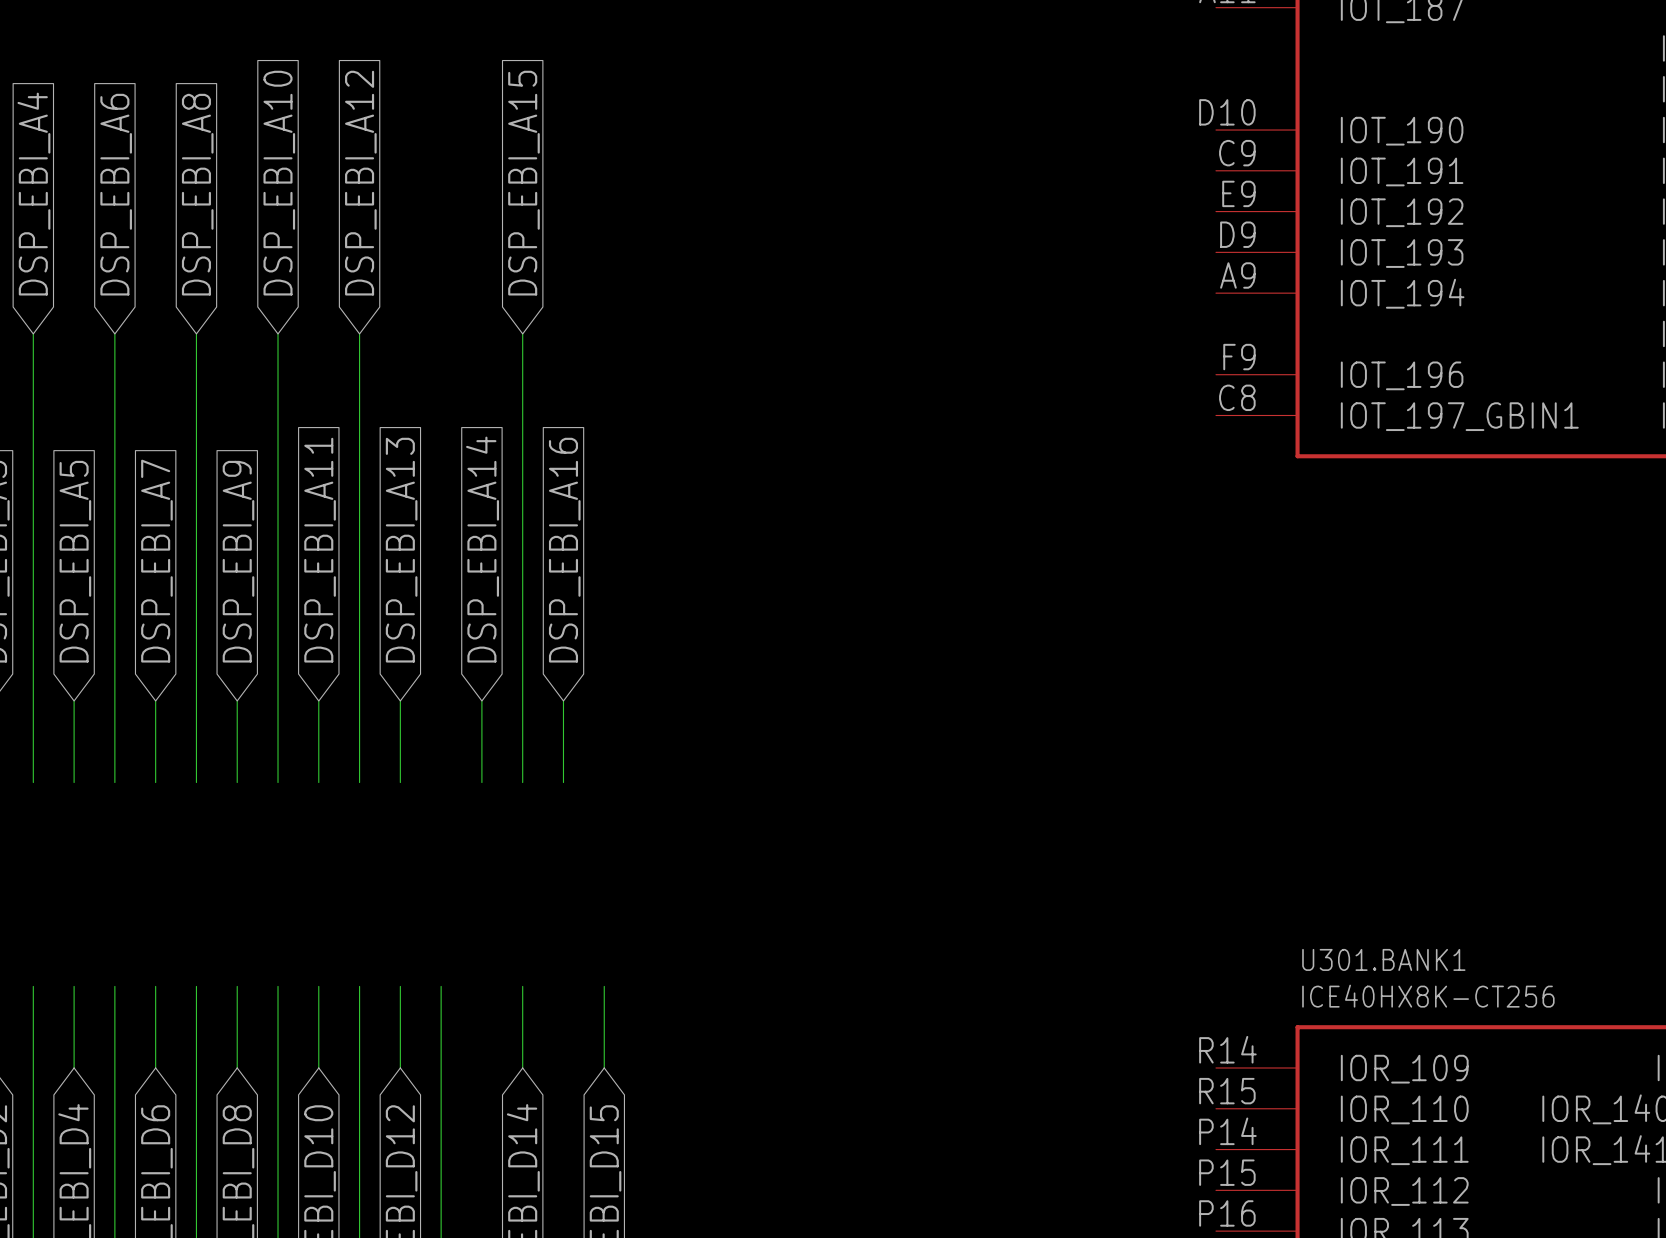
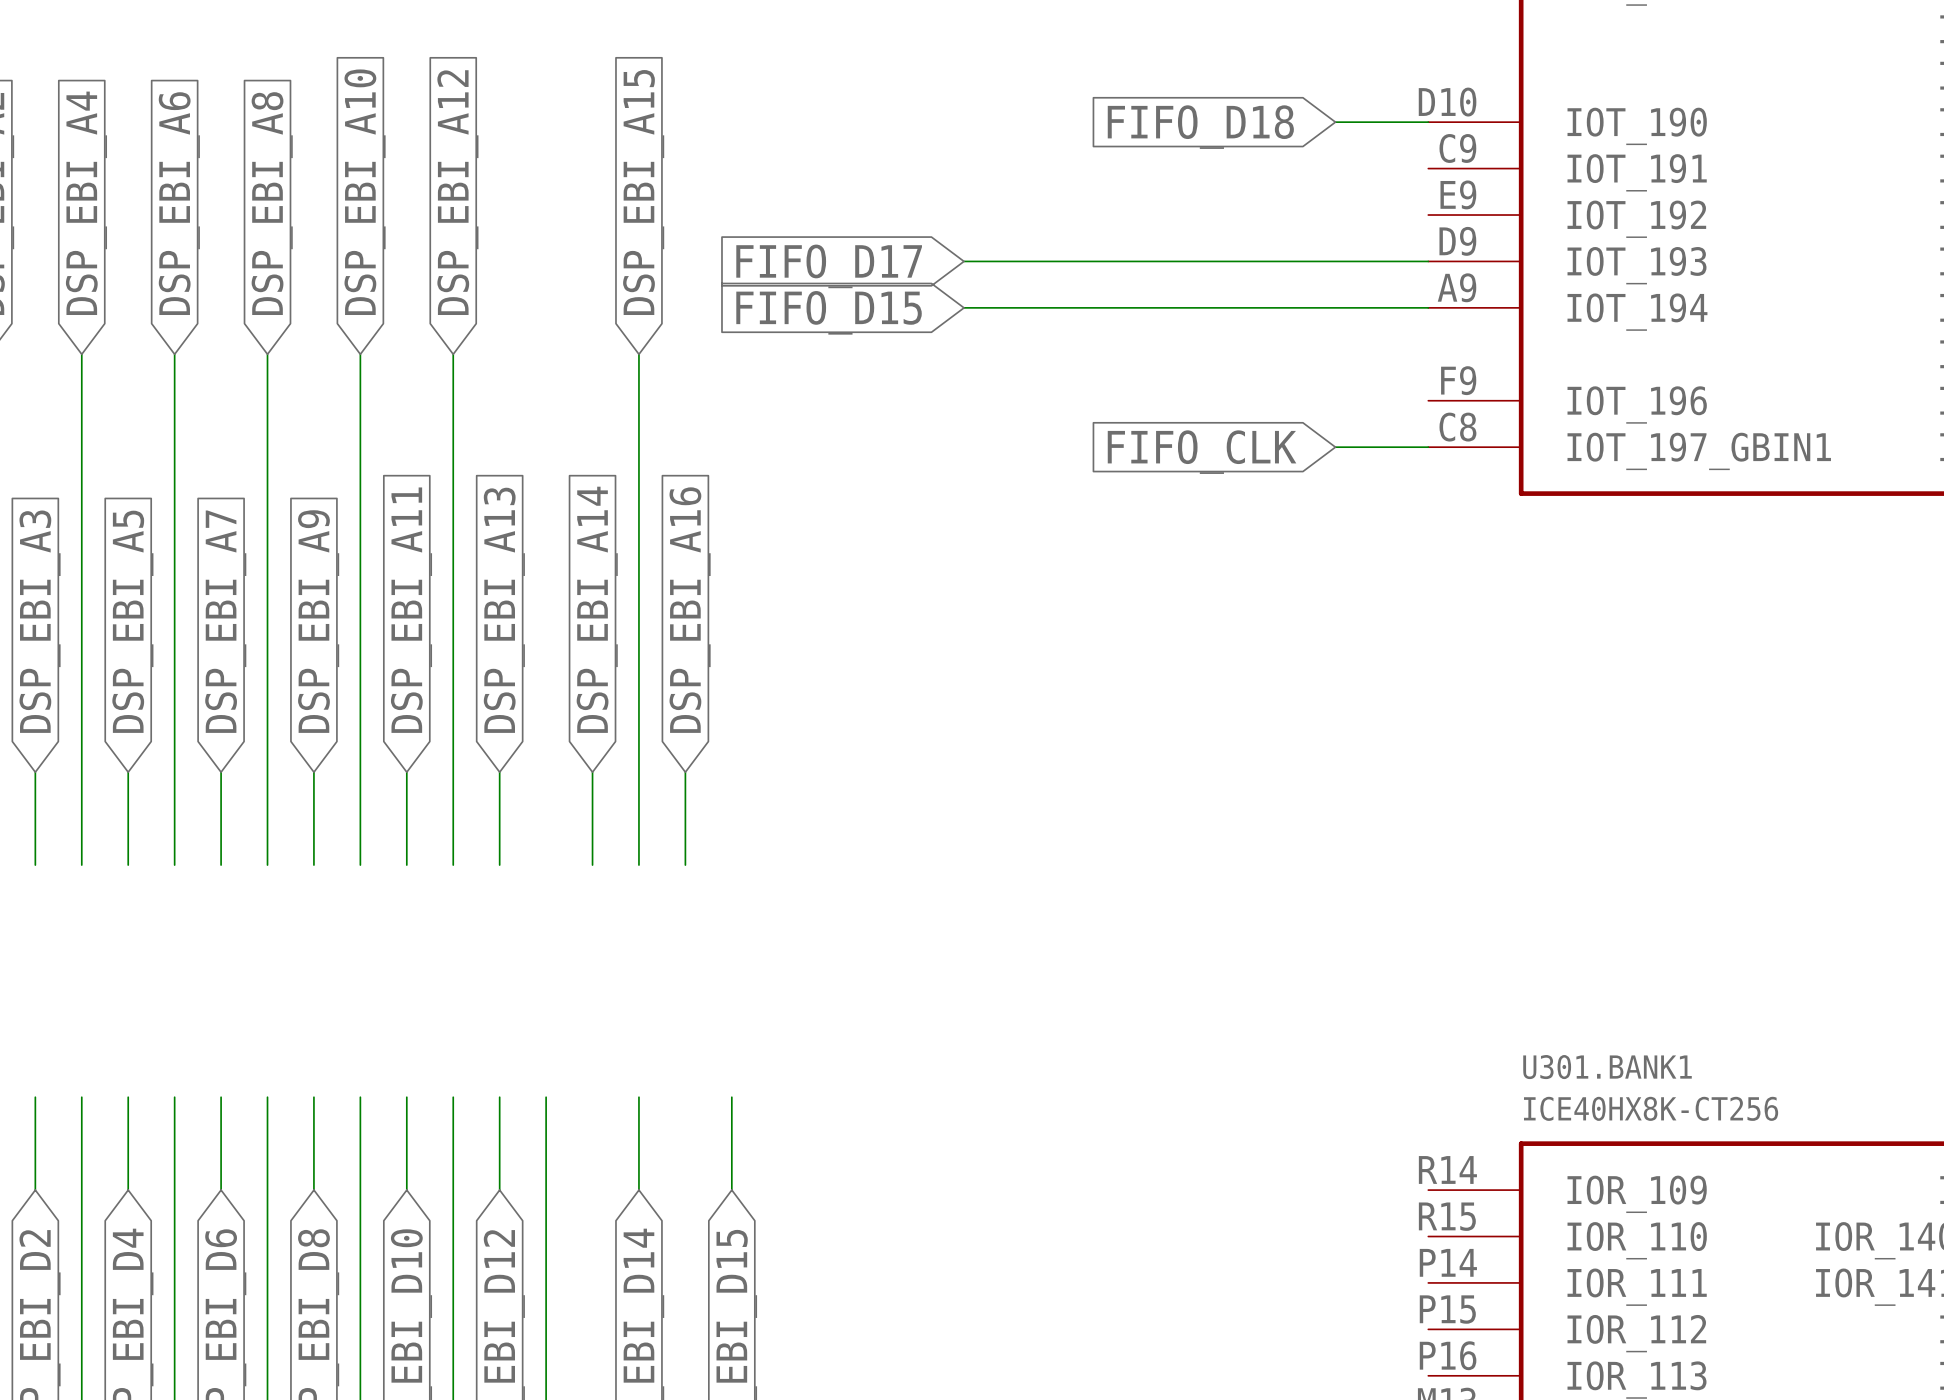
wire: none -> (1335, 122) (1428, 122)
global label: none -> FIFO_D18 (1200, 127)
wire: none -> (963, 261) (1428, 261)
global label: none -> FIFO_D17 (829, 266)
wire: none -> (963, 307) (1428, 307)
global label: none -> FIFO_D15 (829, 312)
wire: none -> (1335, 447) (1428, 447)
global label: none -> FIFO_CLK (1202, 452)

